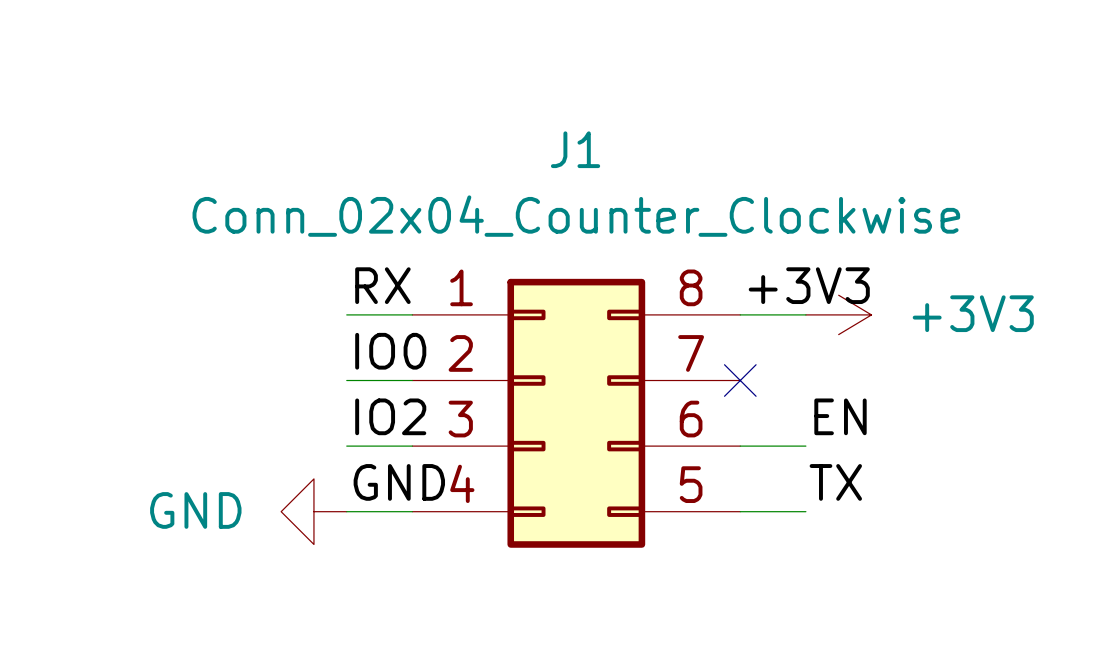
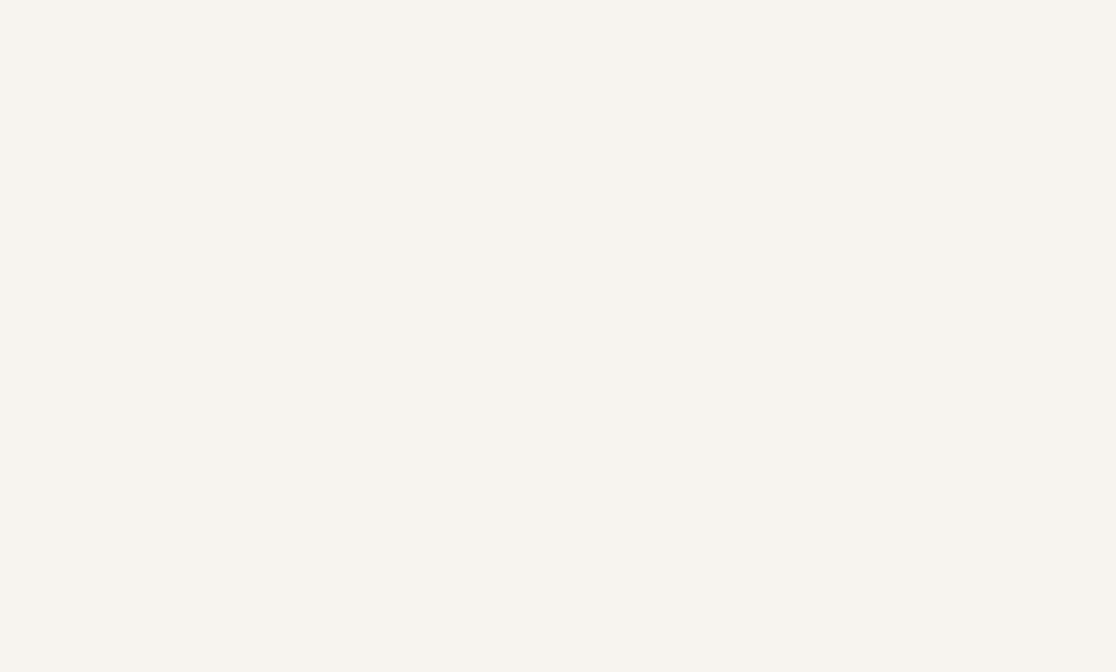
label: RX (382, 285) -> none
label: +3V3 (809, 285) -> none
wire: (346, 314) (412, 314) -> none
wire: (740, 314) (805, 314) -> none
power symbol: +3V3 (838, 314) -> none
label: IO0 (390, 351) -> none
wire: (346, 380) (412, 380) -> none
no-connect mark: (740, 380) -> none
J1: Conn_02x04_Counter_Clockwise (576, 413) -> none
label: IO2 (390, 416) -> none
label: EN (840, 416) -> none
wire: (346, 446) (412, 446) -> none
wire: (740, 446) (805, 446) -> none
label: GND (399, 482) -> none
label: TX (835, 482) -> none
power symbol: GND (313, 511) -> none
wire: (346, 511) (412, 511) -> none
wire: (740, 511) (805, 511) -> none

